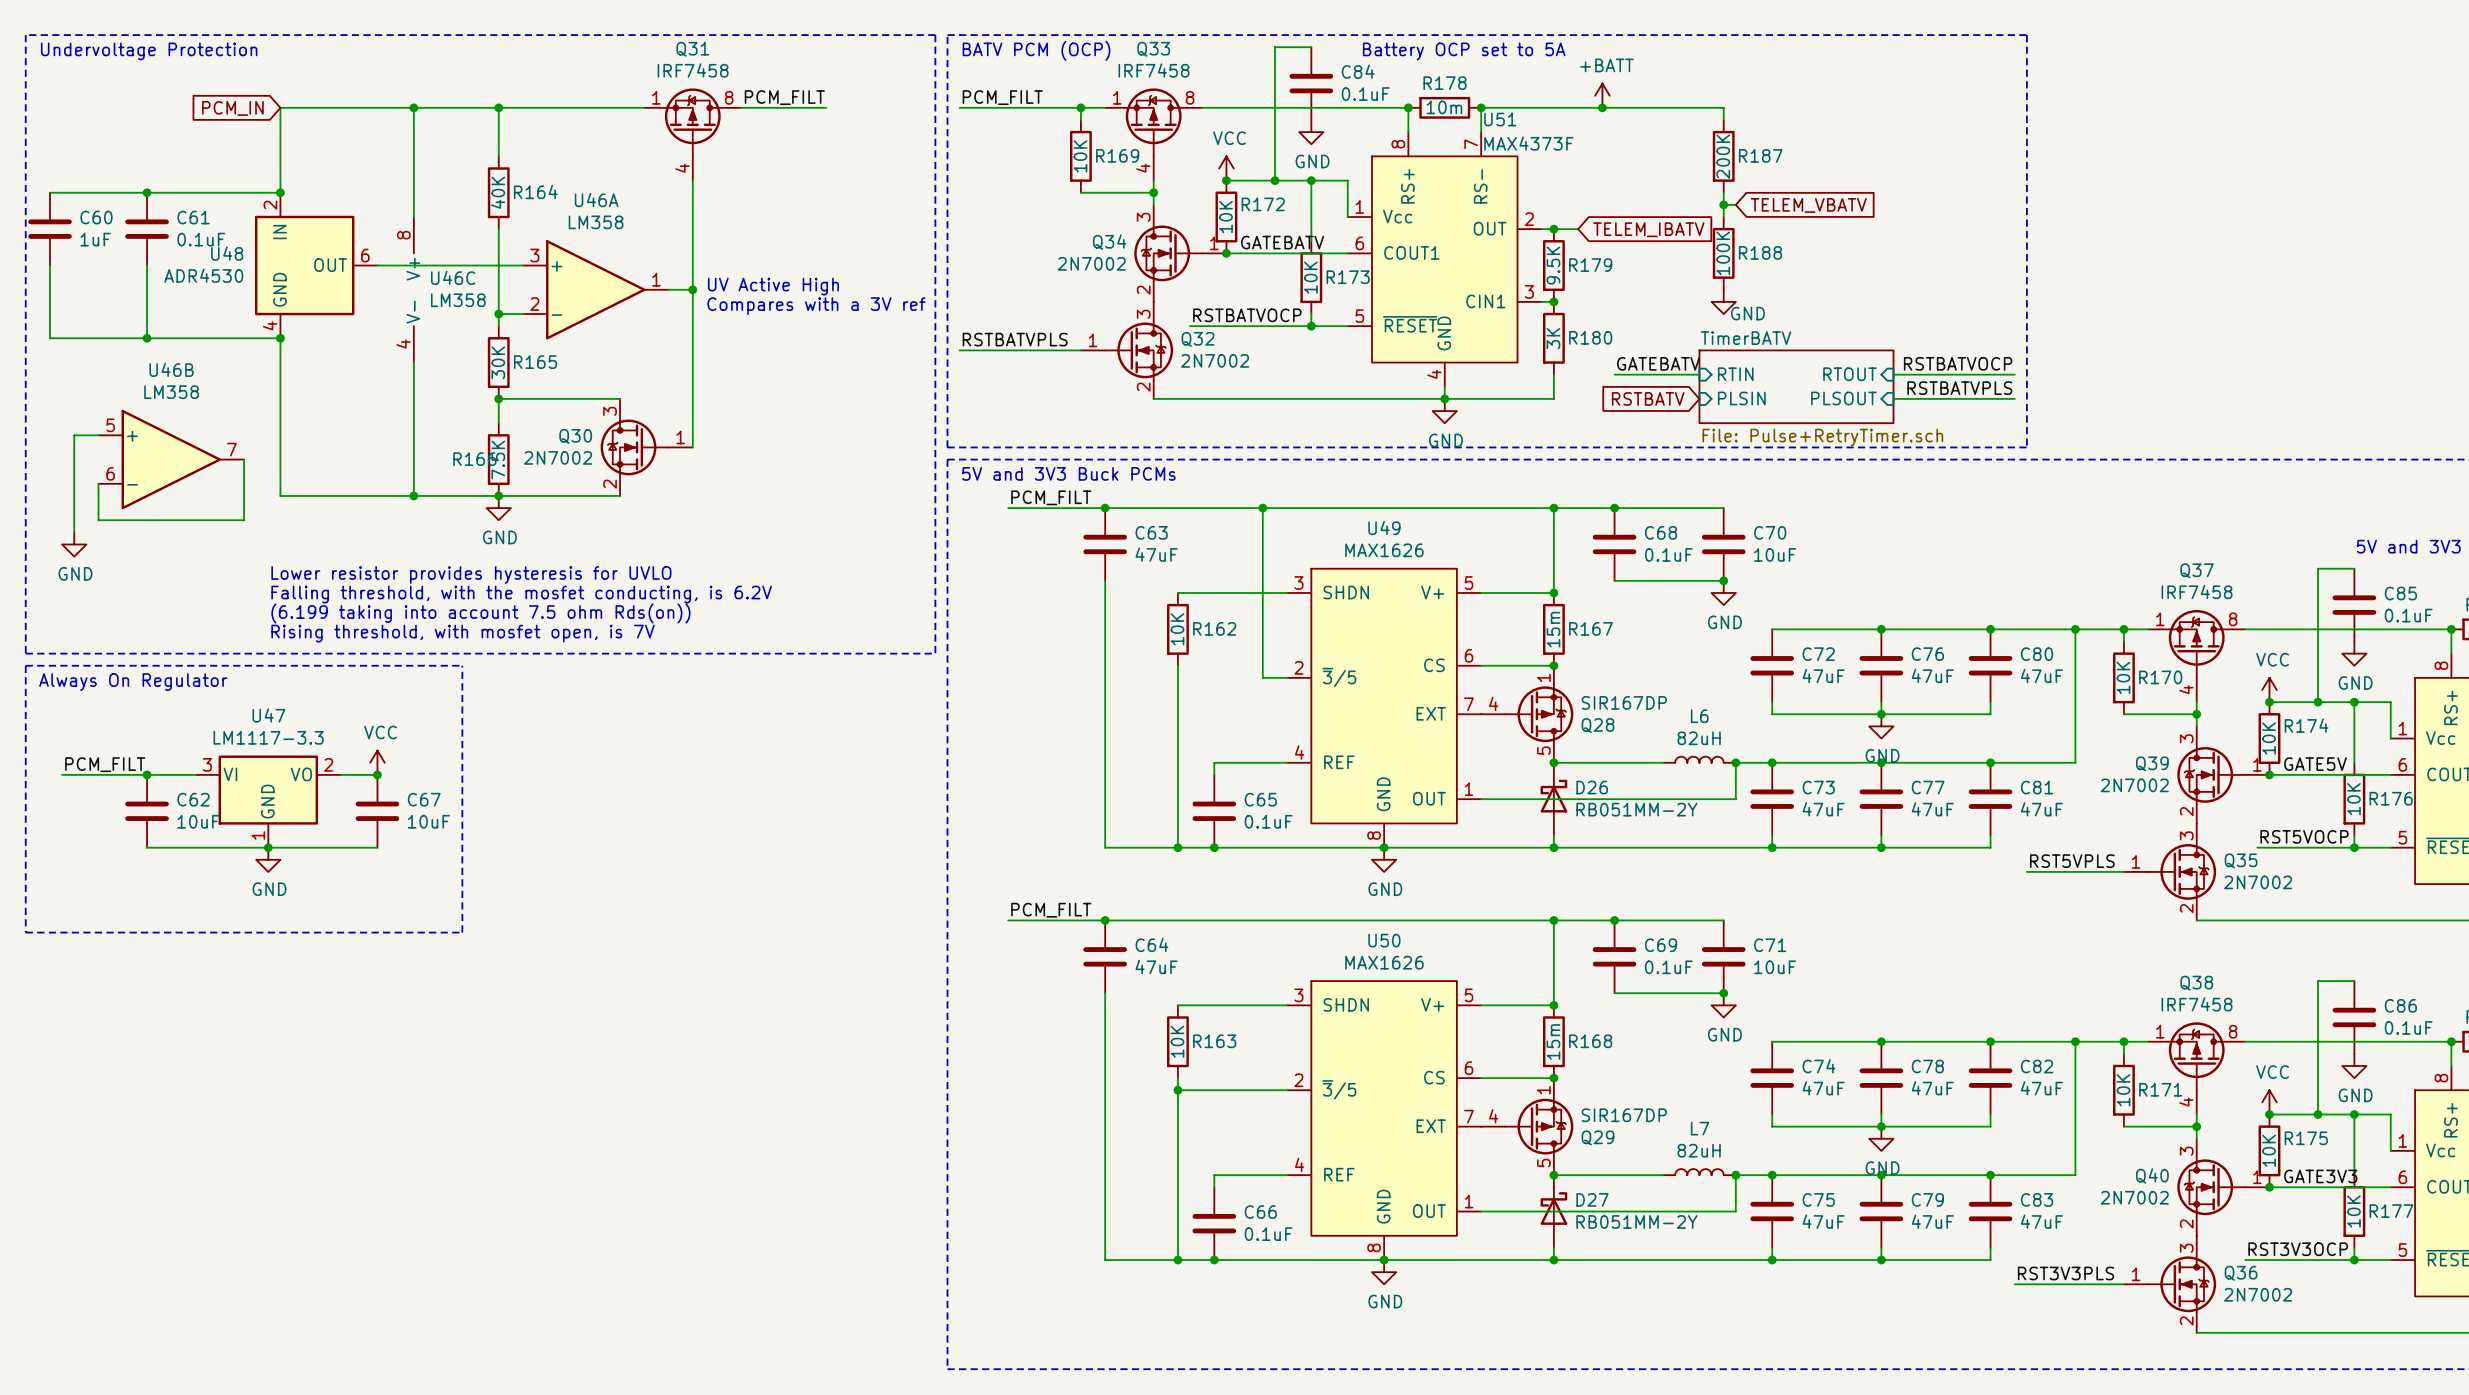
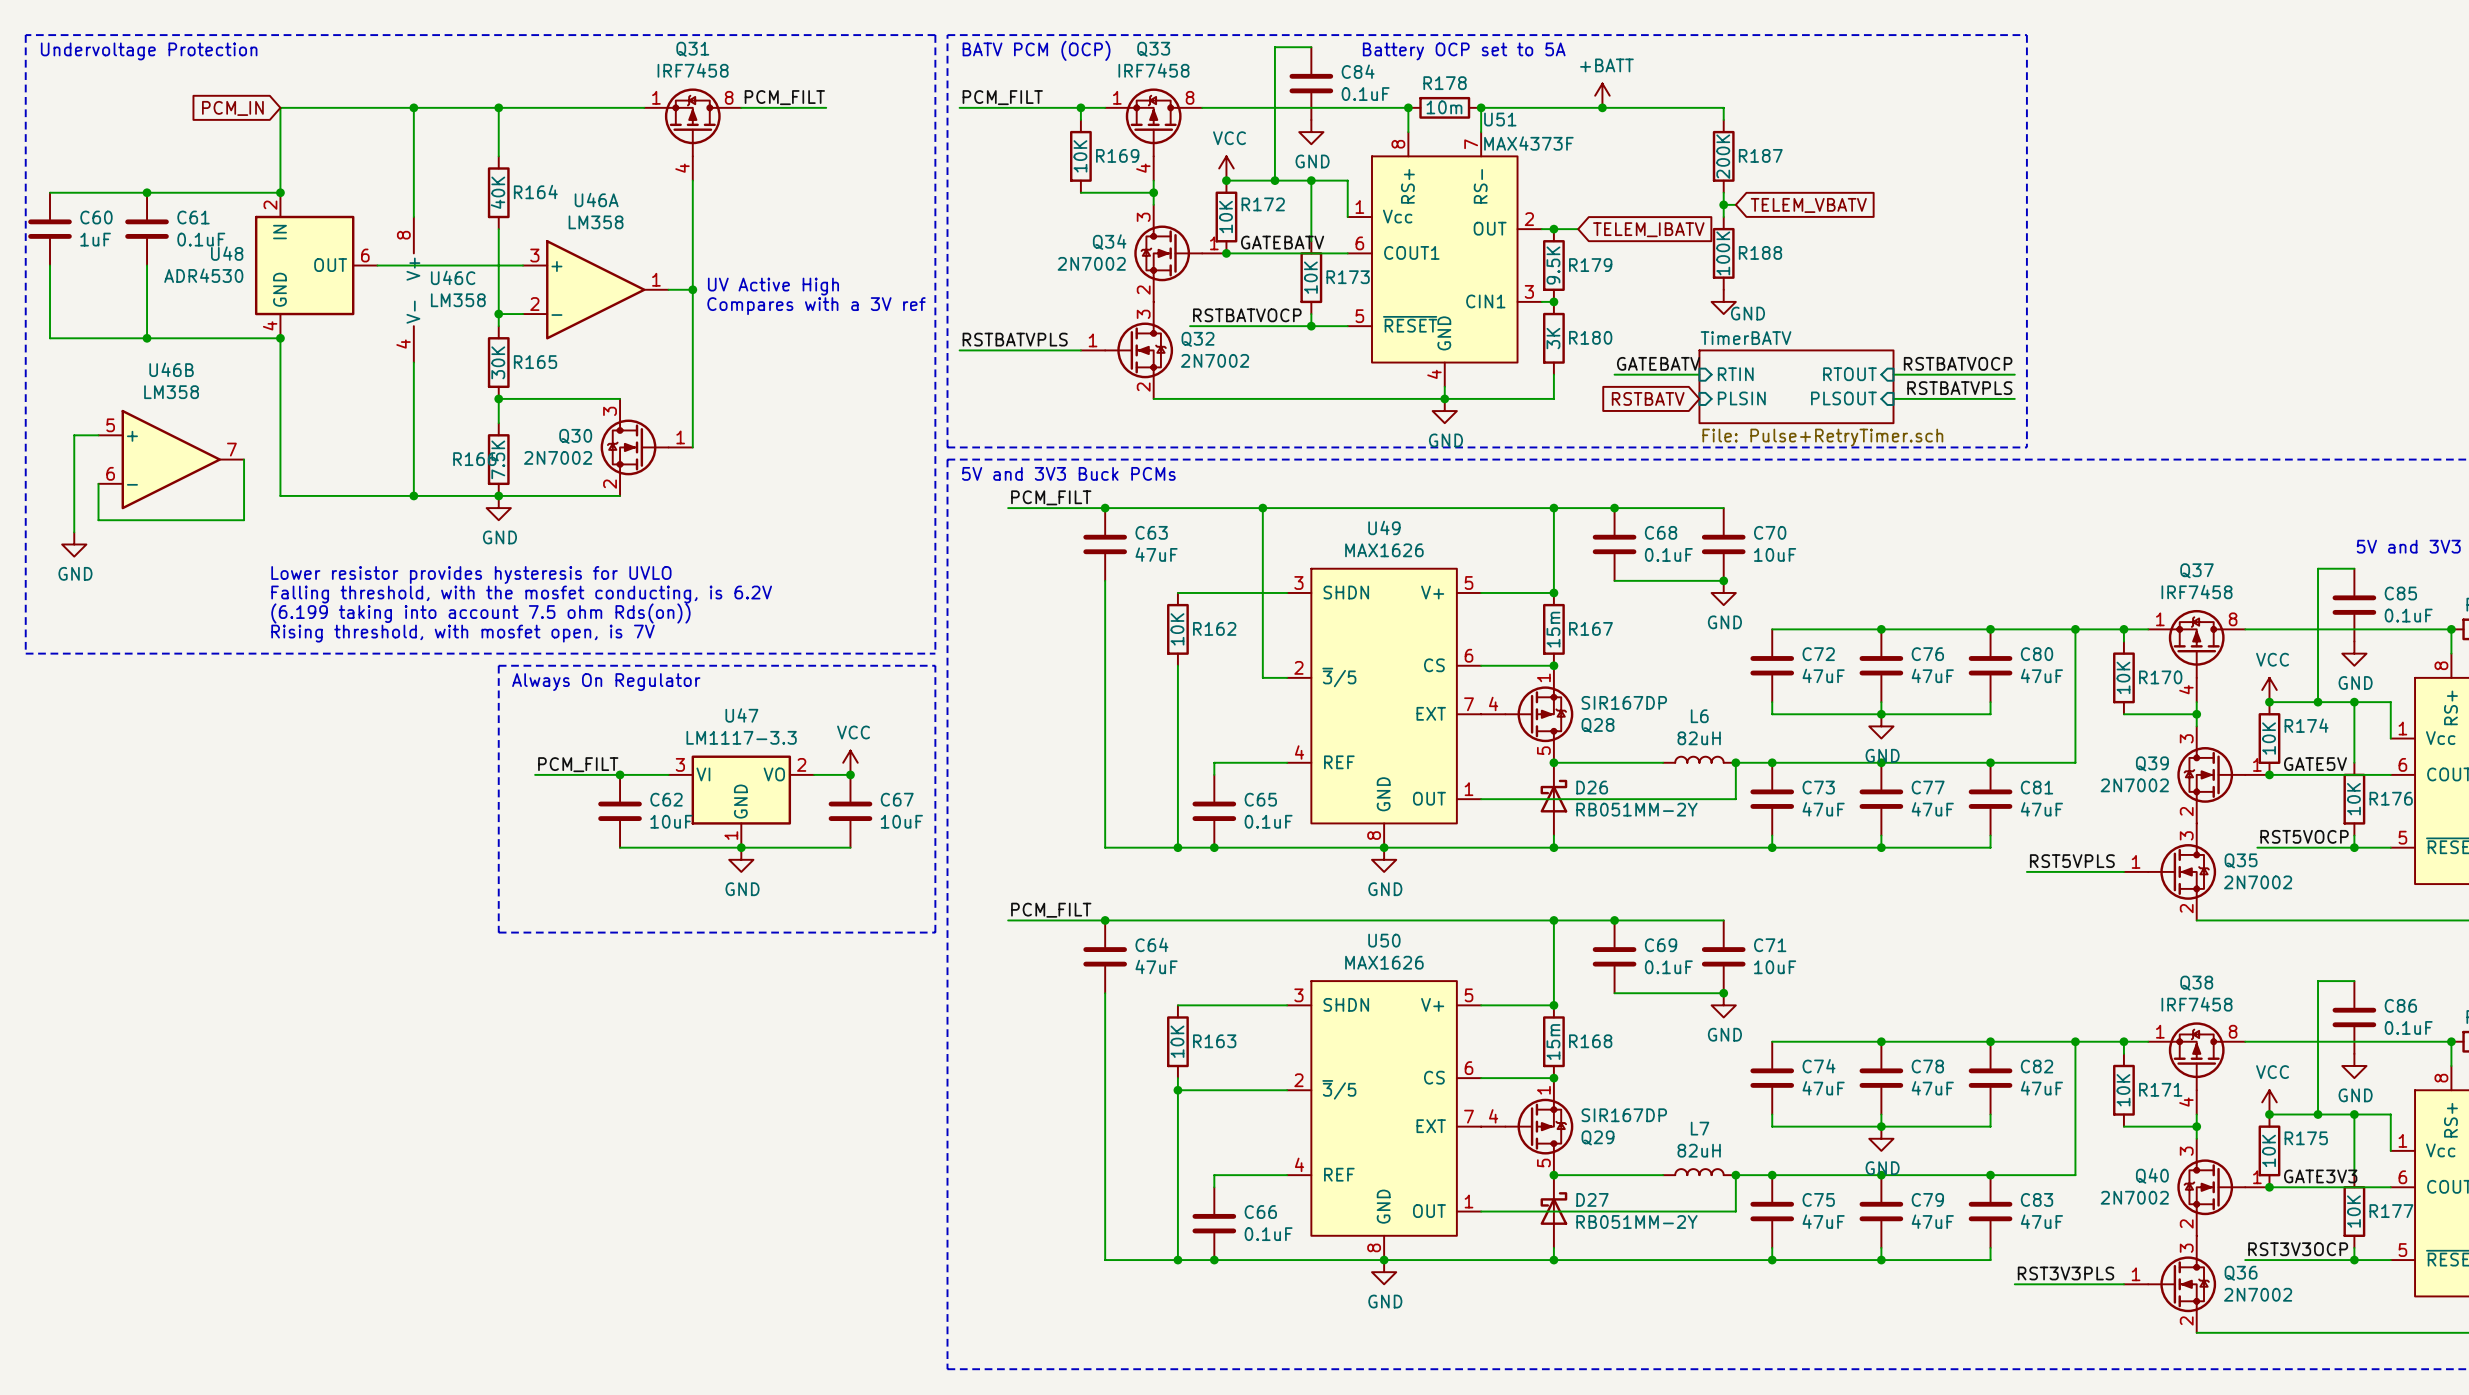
line: (25, 665) (25, 932) (462, 932) (462, 665) (25, 665) -> none
line: none -> (498, 665) (498, 932) (935, 932) (935, 665) (498, 665)
text: Always On Regulator (133, 682) -> none
text: none -> Always On Regulator (606, 682)
power symbol: VCC (377, 762) -> none
power symbol: none -> VCC (850, 762)
label: PCM_FILT (105, 764) -> none
label: none -> PCM_FILT (578, 764)
wire: (62, 774) (195, 774) -> none
junction: (147, 774) -> none
wire: (341, 774) (377, 774) -> none
junction: (377, 774) -> none
wire: none -> (535, 774) (668, 774)
junction: none -> (620, 774)
wire: none -> (814, 774) (850, 774)
junction: none -> (850, 774)
U47 position: (268, 801) -> (741, 801)
C62 position: (147, 811) -> (620, 811)
C67 position: (377, 811) -> (850, 811)
wire: (147, 847) (377, 847) -> none
junction: (268, 847) -> none
wire: none -> (620, 847) (850, 847)
junction: none -> (741, 847)
power symbol: GND (268, 859) -> none
power symbol: none -> GND (741, 859)

